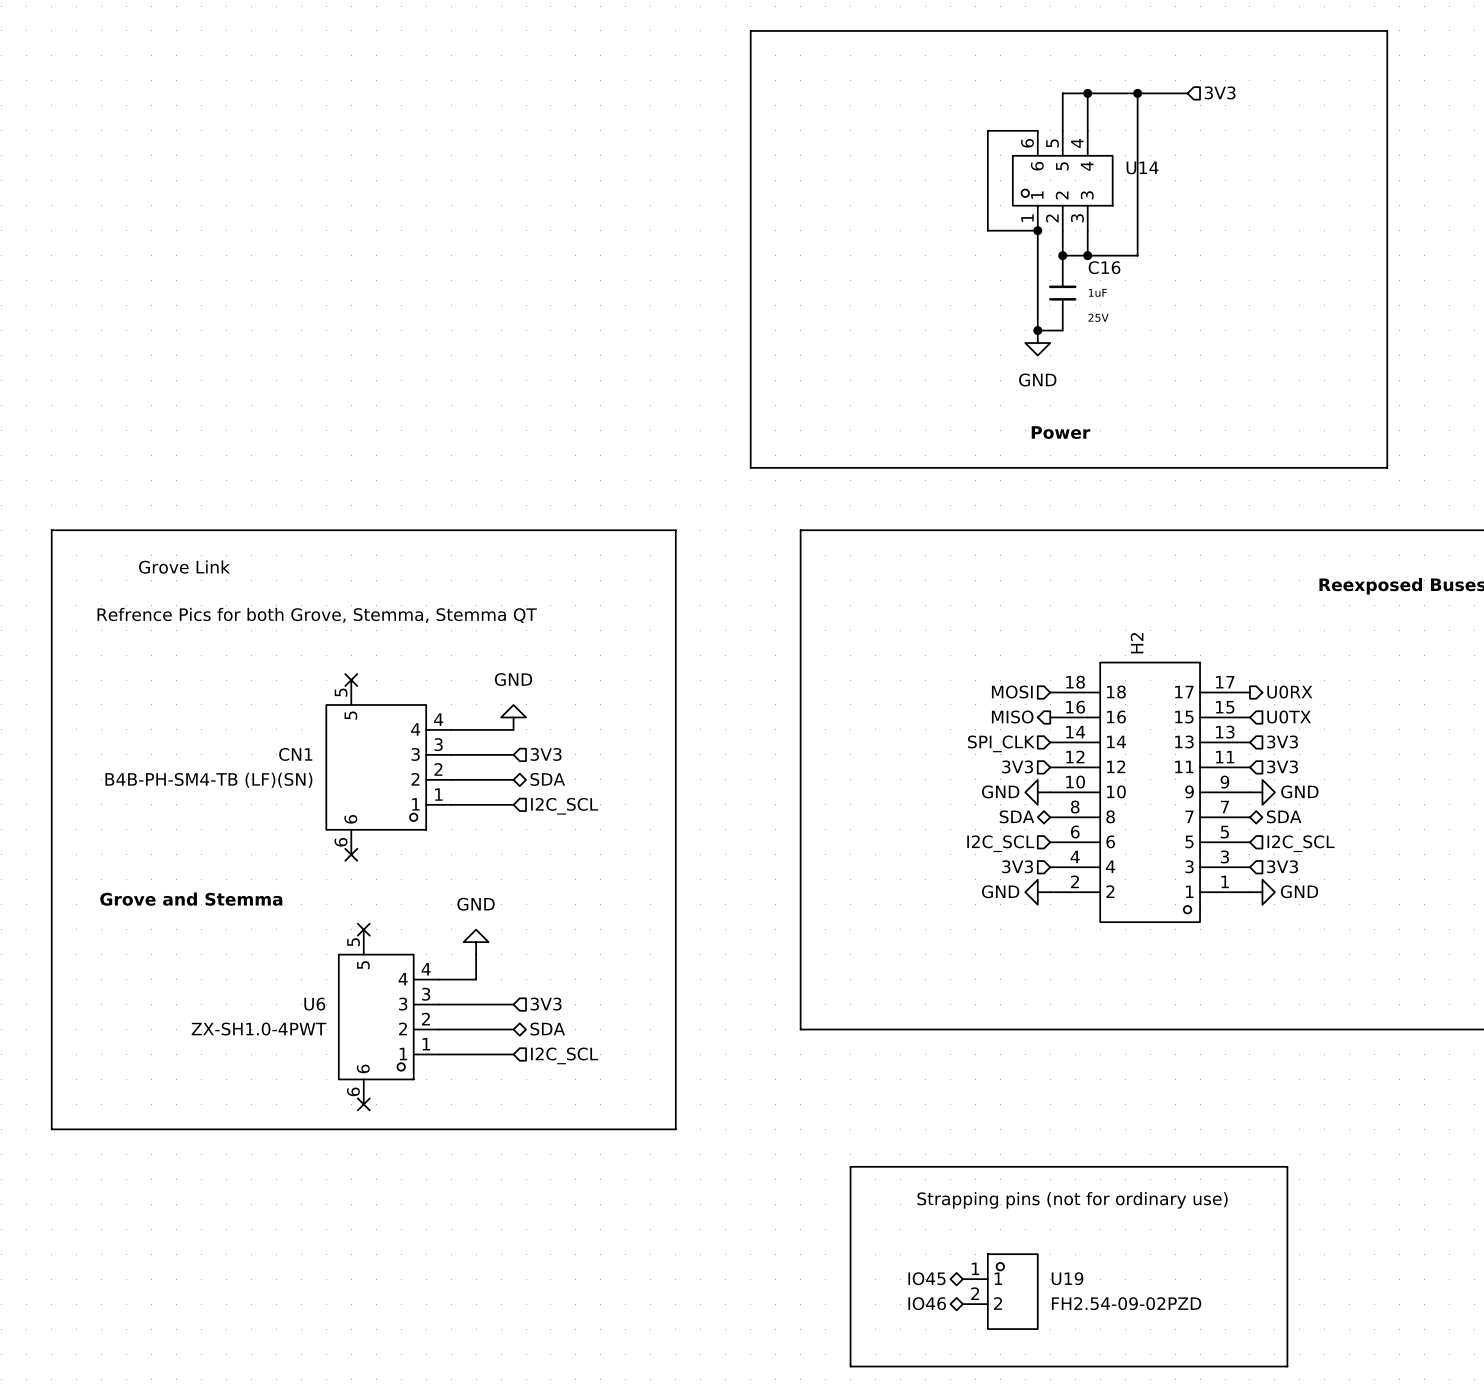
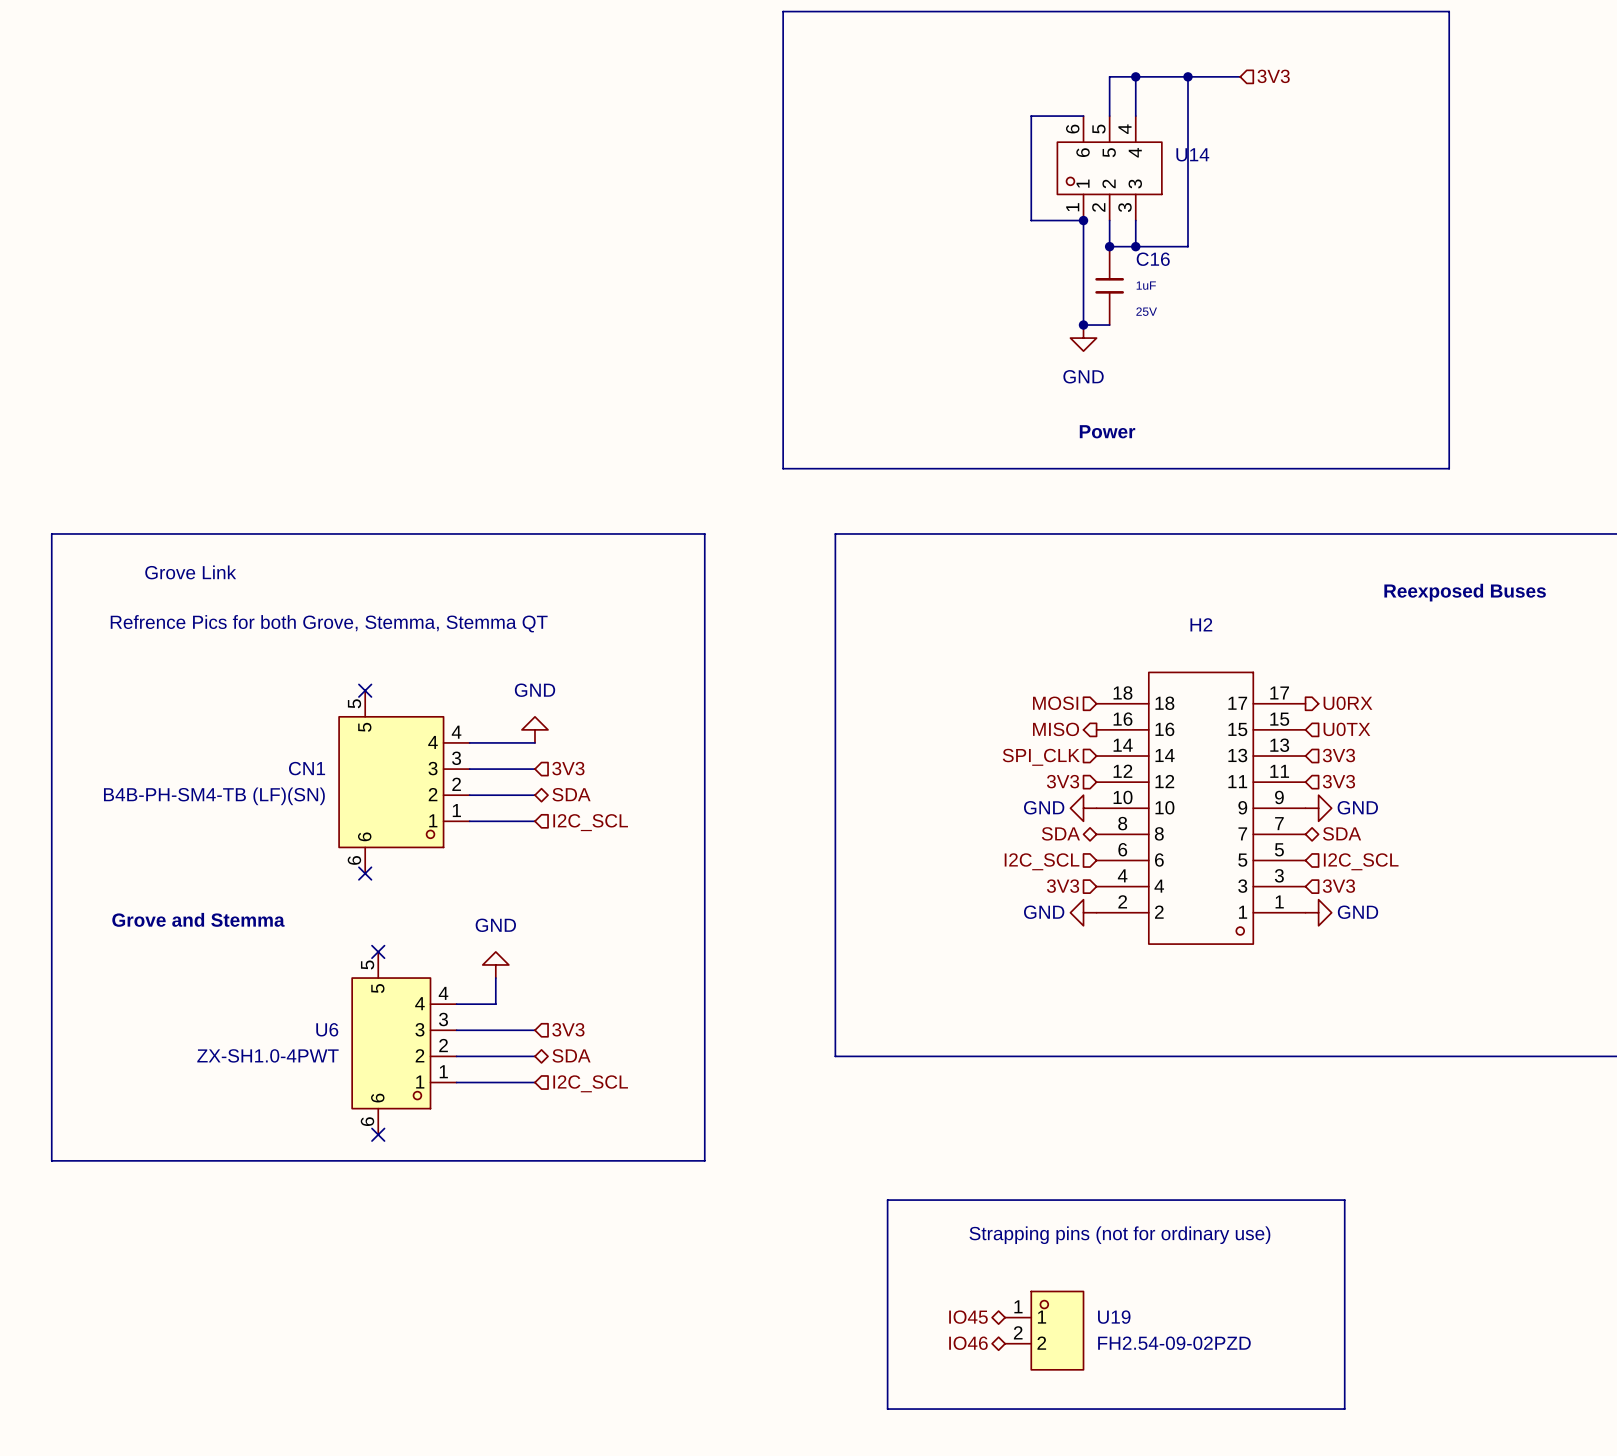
H2 name rotation: 0° (1137, 643) -> 90° clockwise (1201, 624)

